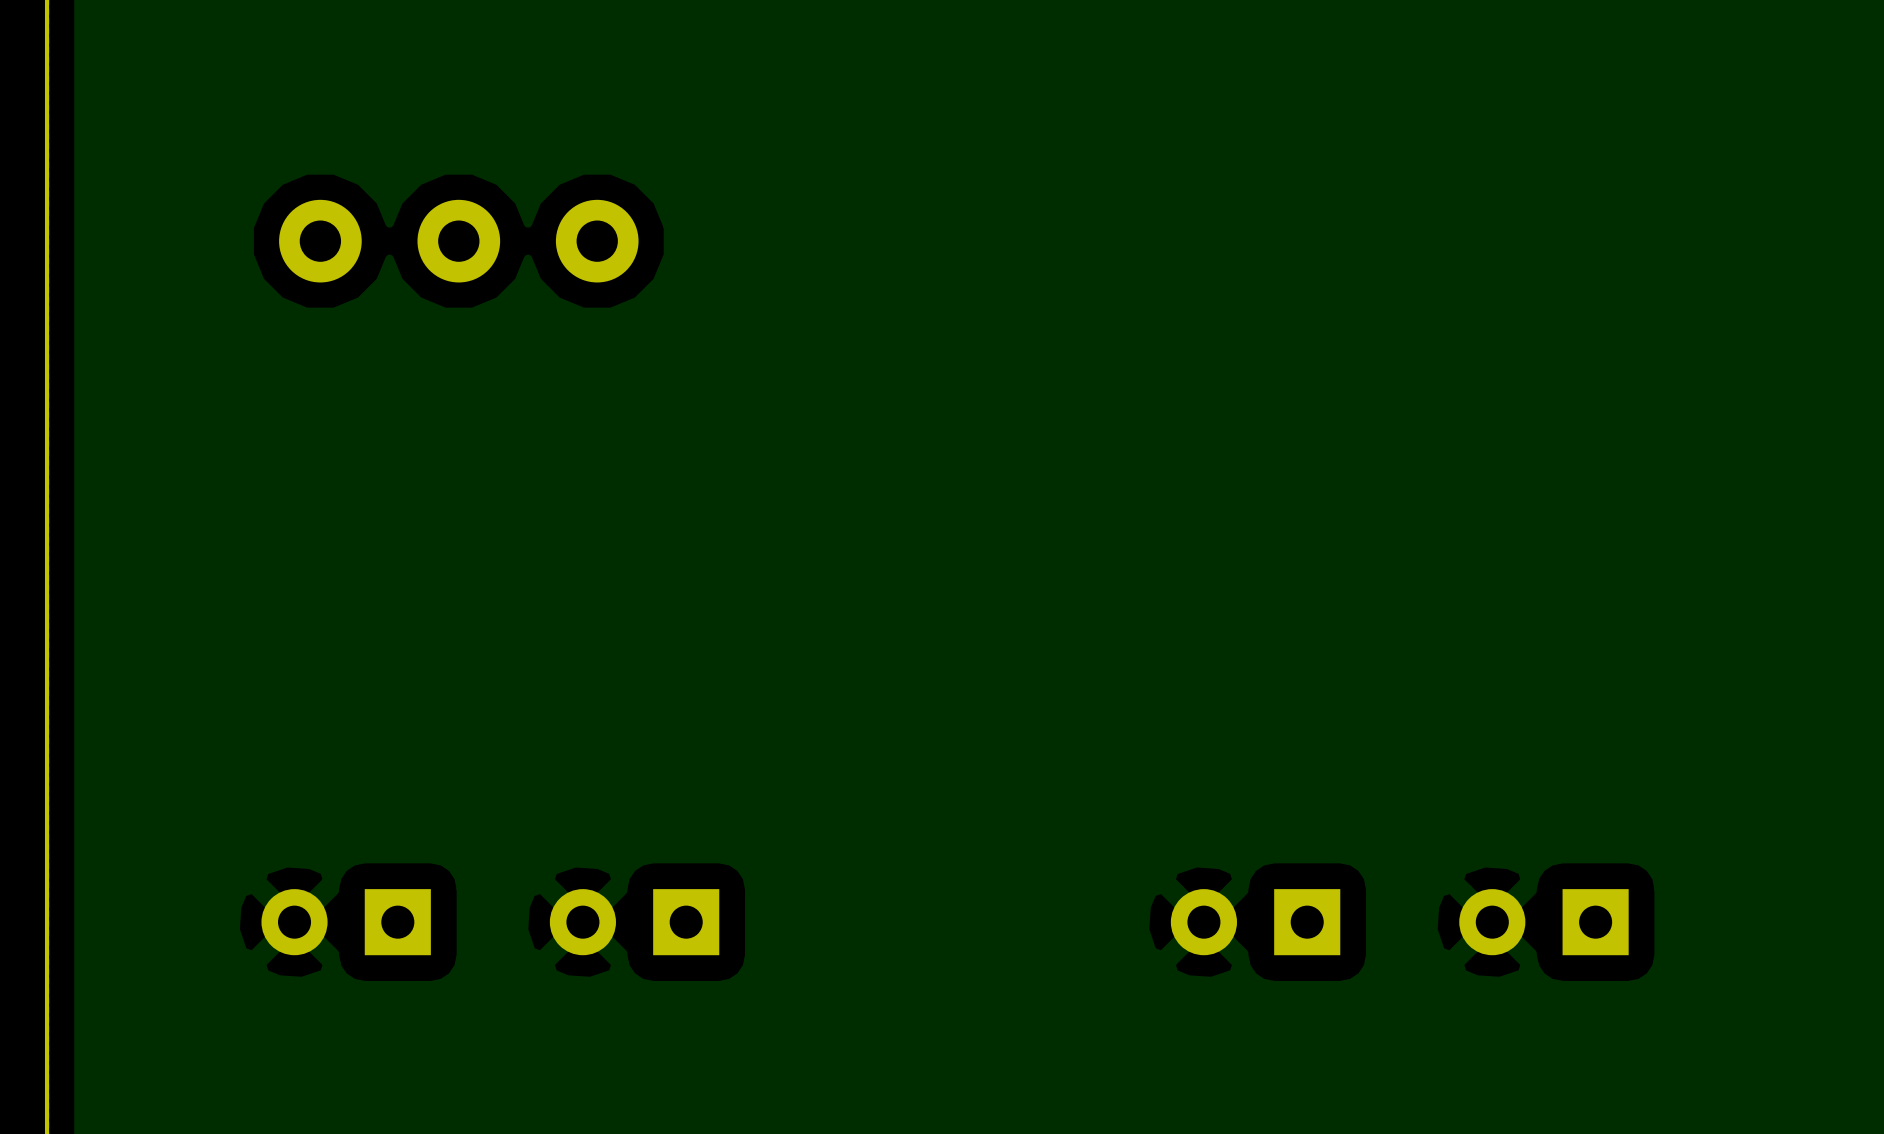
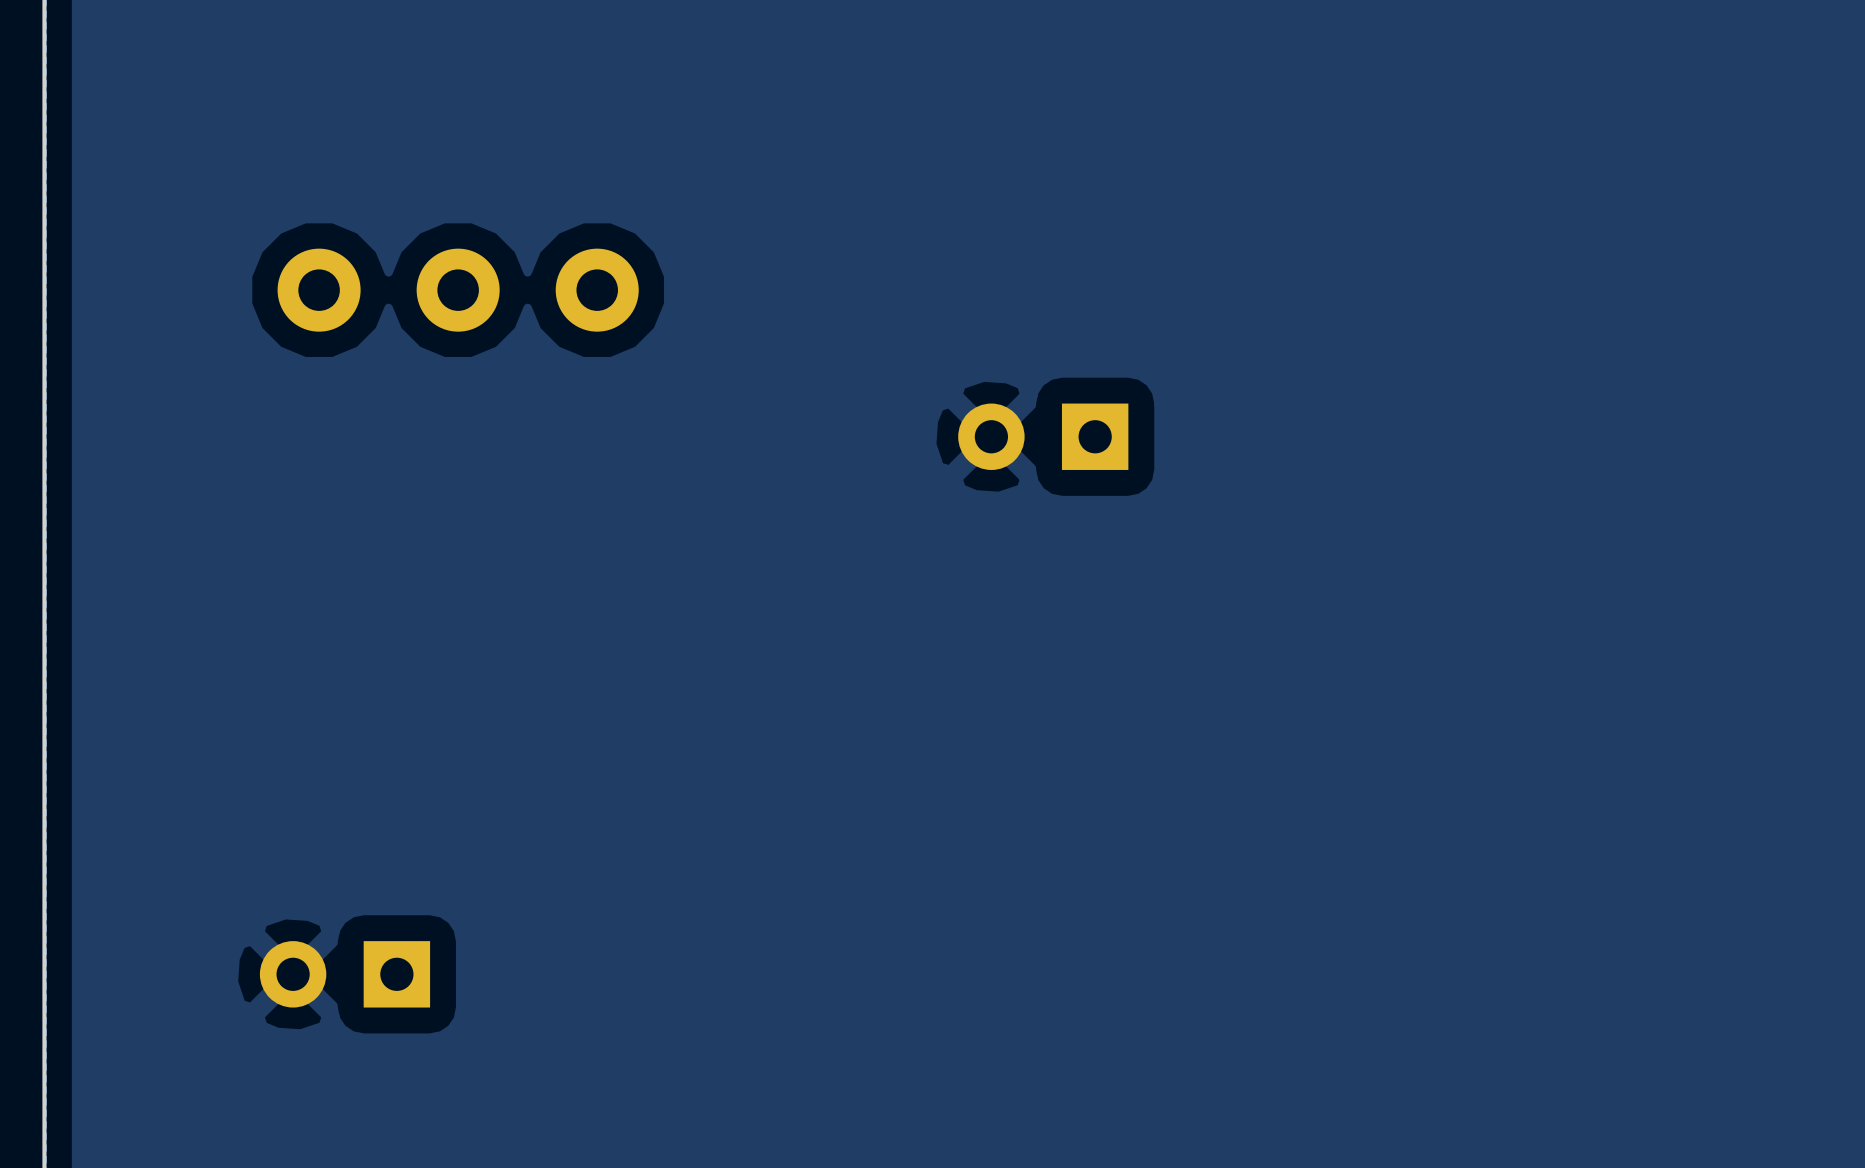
part: none -> (1043, 436)
part: (634, 922) -> none
part: (1255, 922) -> none
part: (1543, 922) -> none

